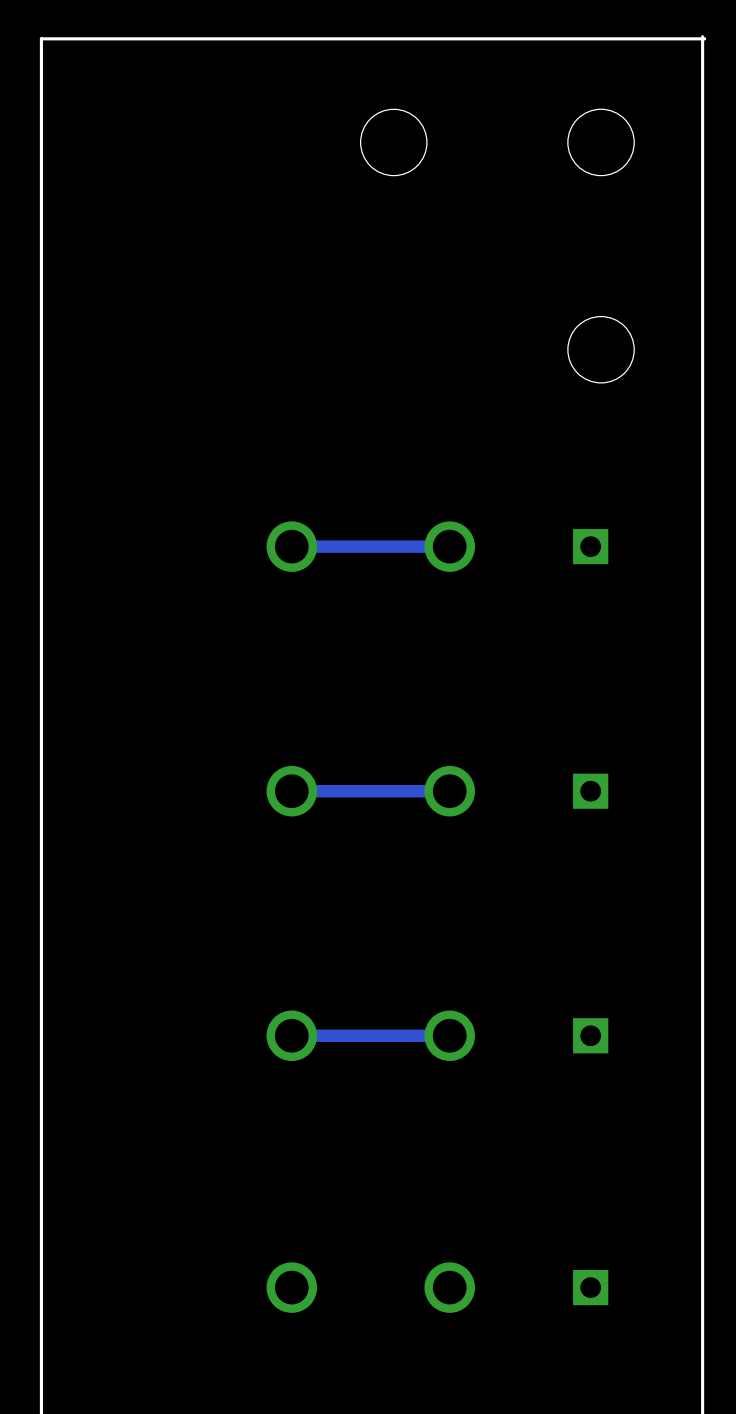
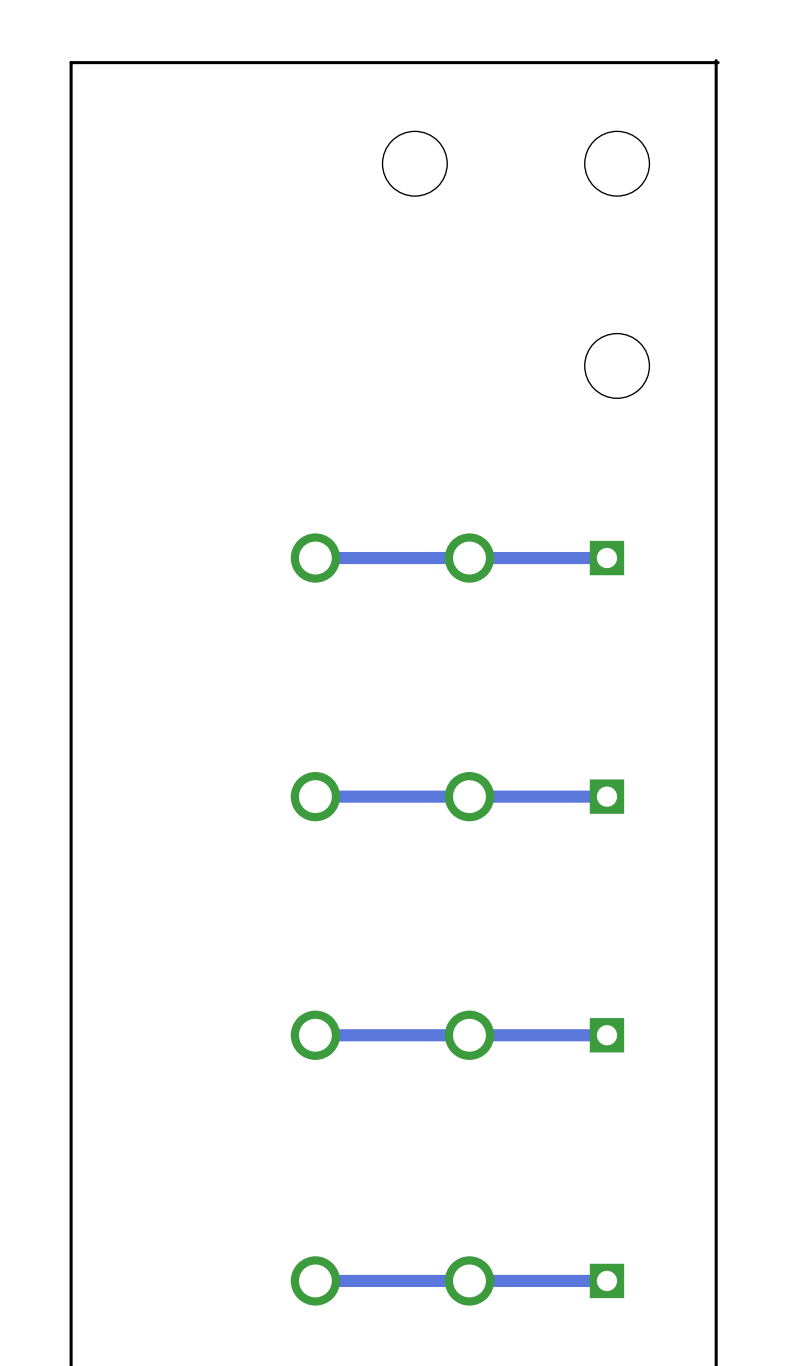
bottom track: none -> (606, 558) (469, 558)
bottom track: none -> (606, 796) (469, 796)
bottom track: none -> (606, 1035) (470, 1035)
bottom track: none -> (606, 1280) (315, 1280)

